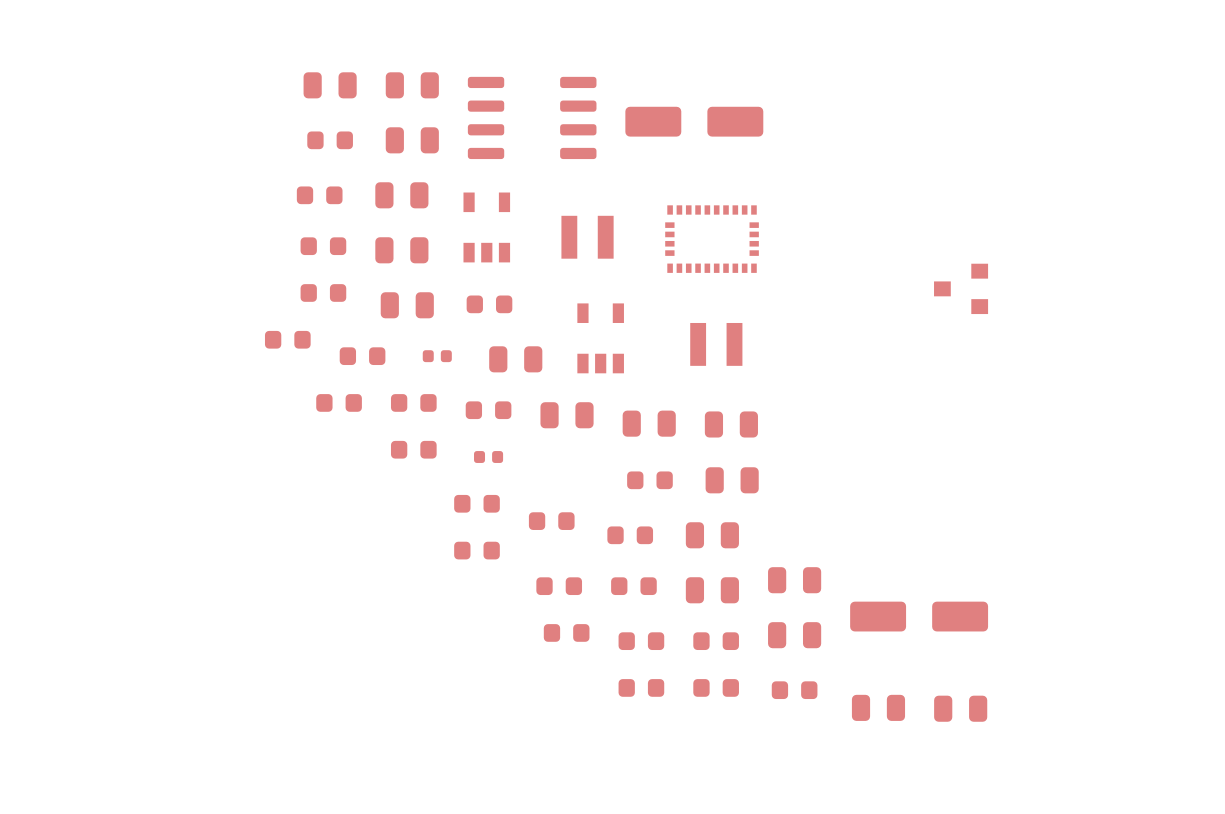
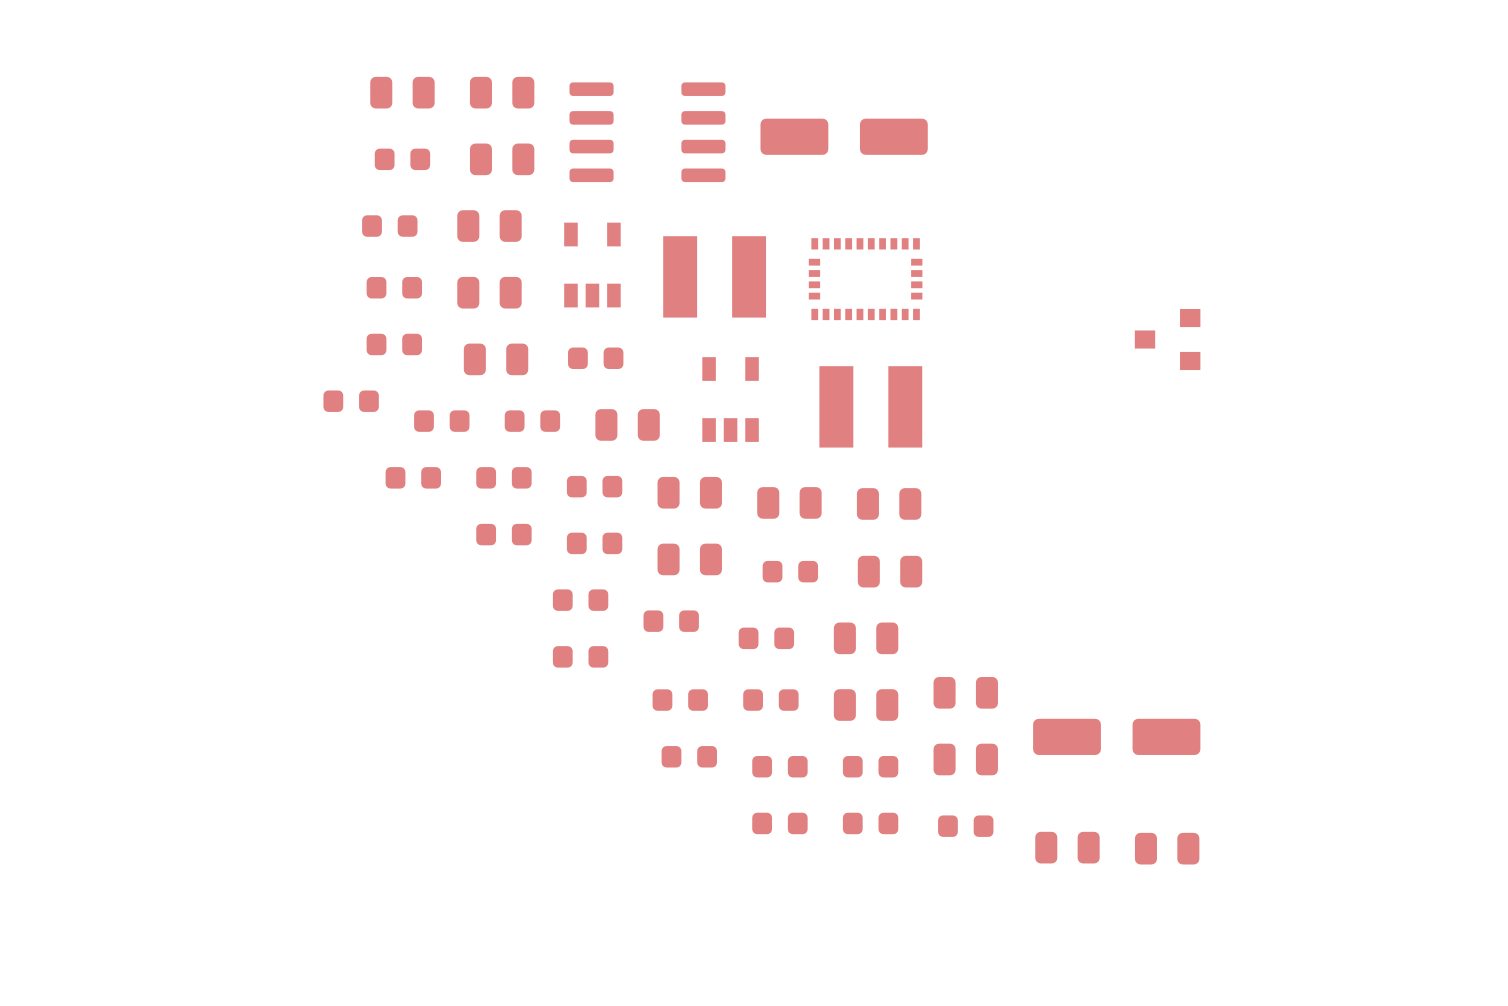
part footprint: [561, 215, 614, 259] -> [663, 236, 767, 318]
part footprint: [690, 322, 743, 366] -> [819, 366, 923, 448]
part footprint: [422, 350, 452, 363] -> [504, 410, 561, 432]
part footprint: [474, 451, 504, 463] -> [566, 532, 623, 555]
part: none -> (689, 559)

